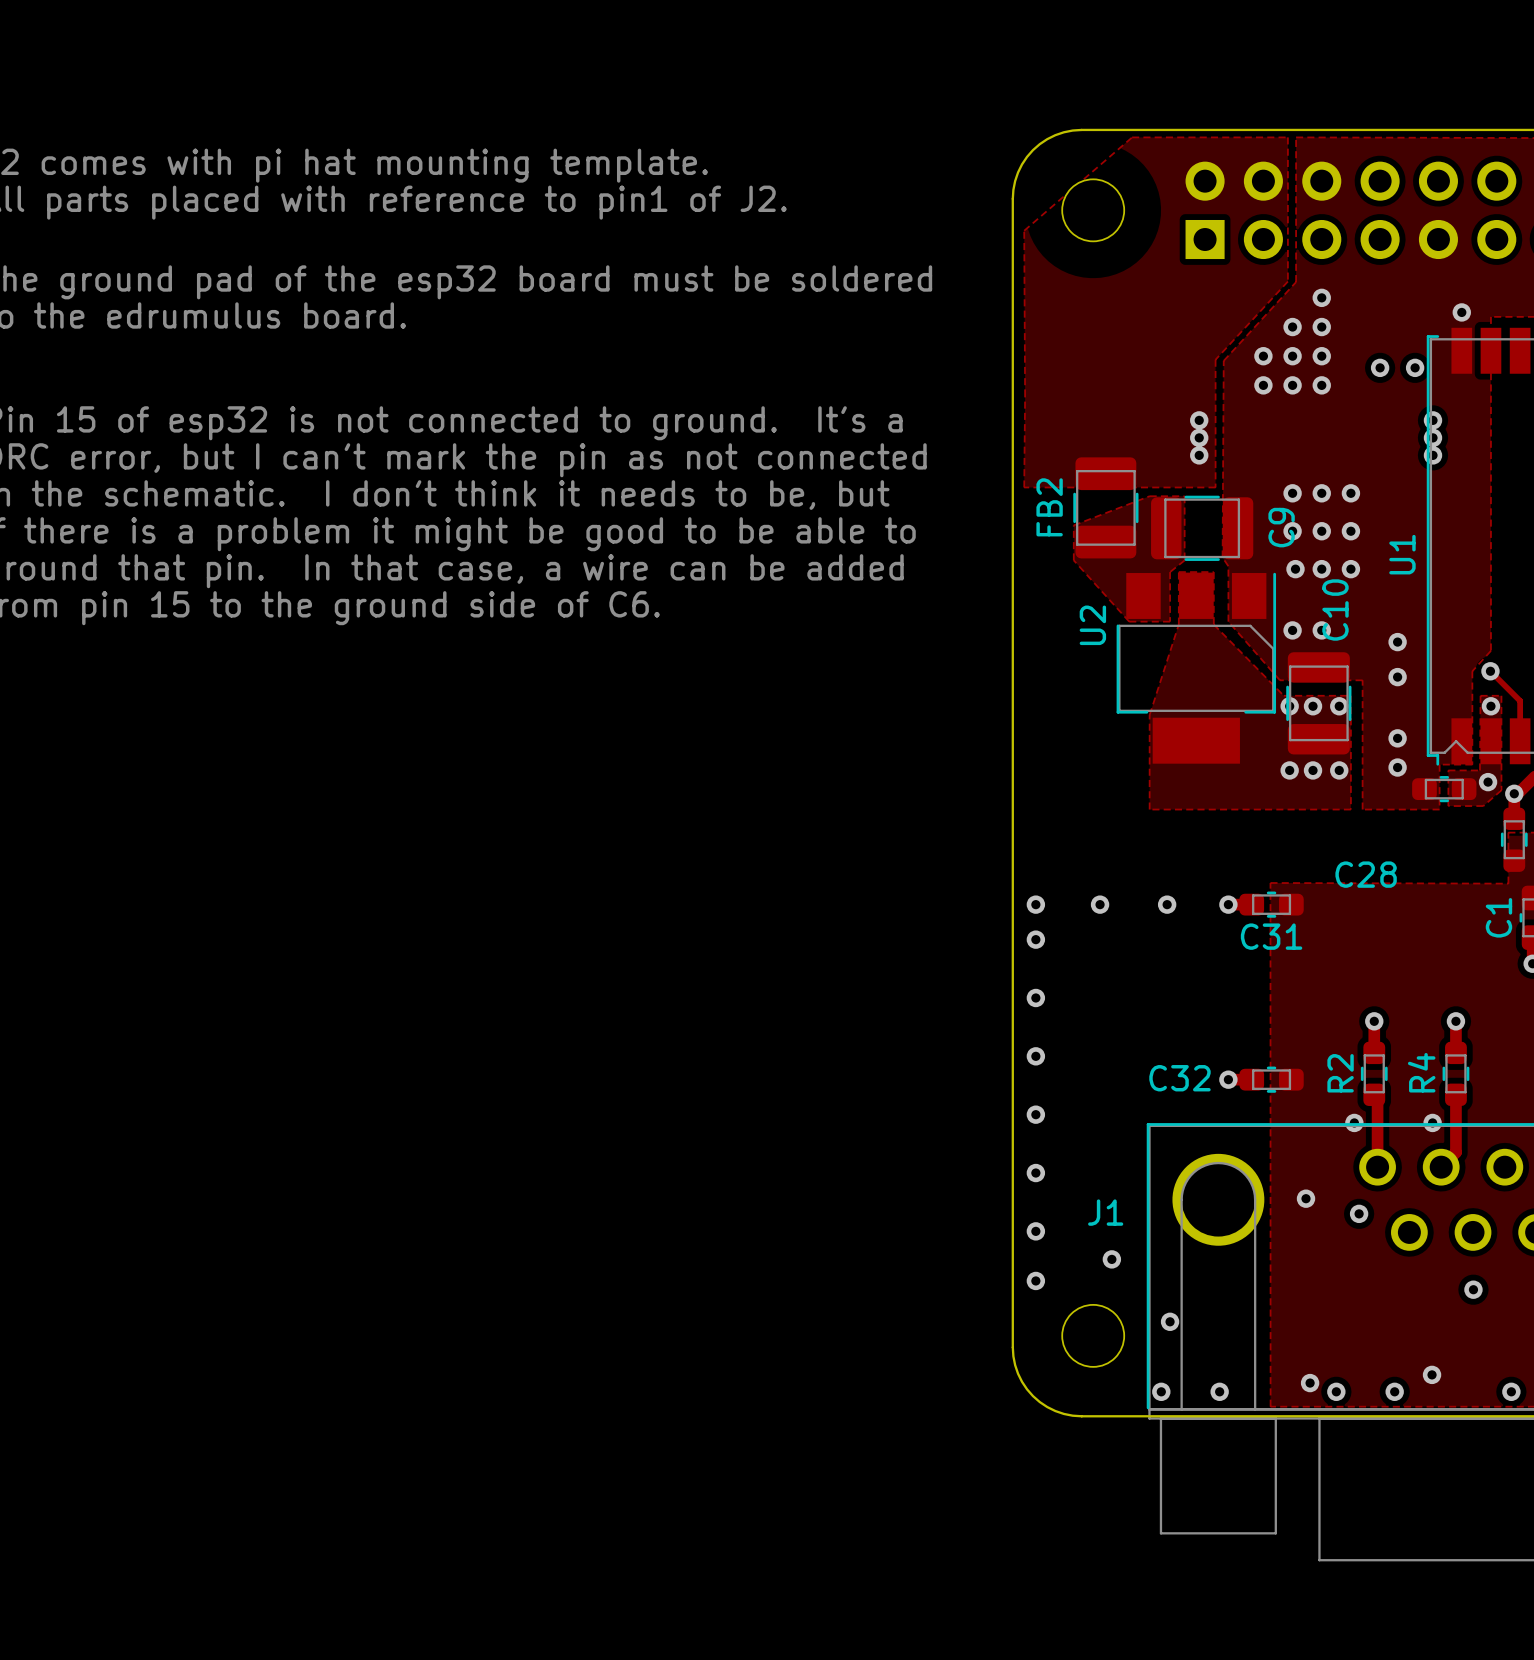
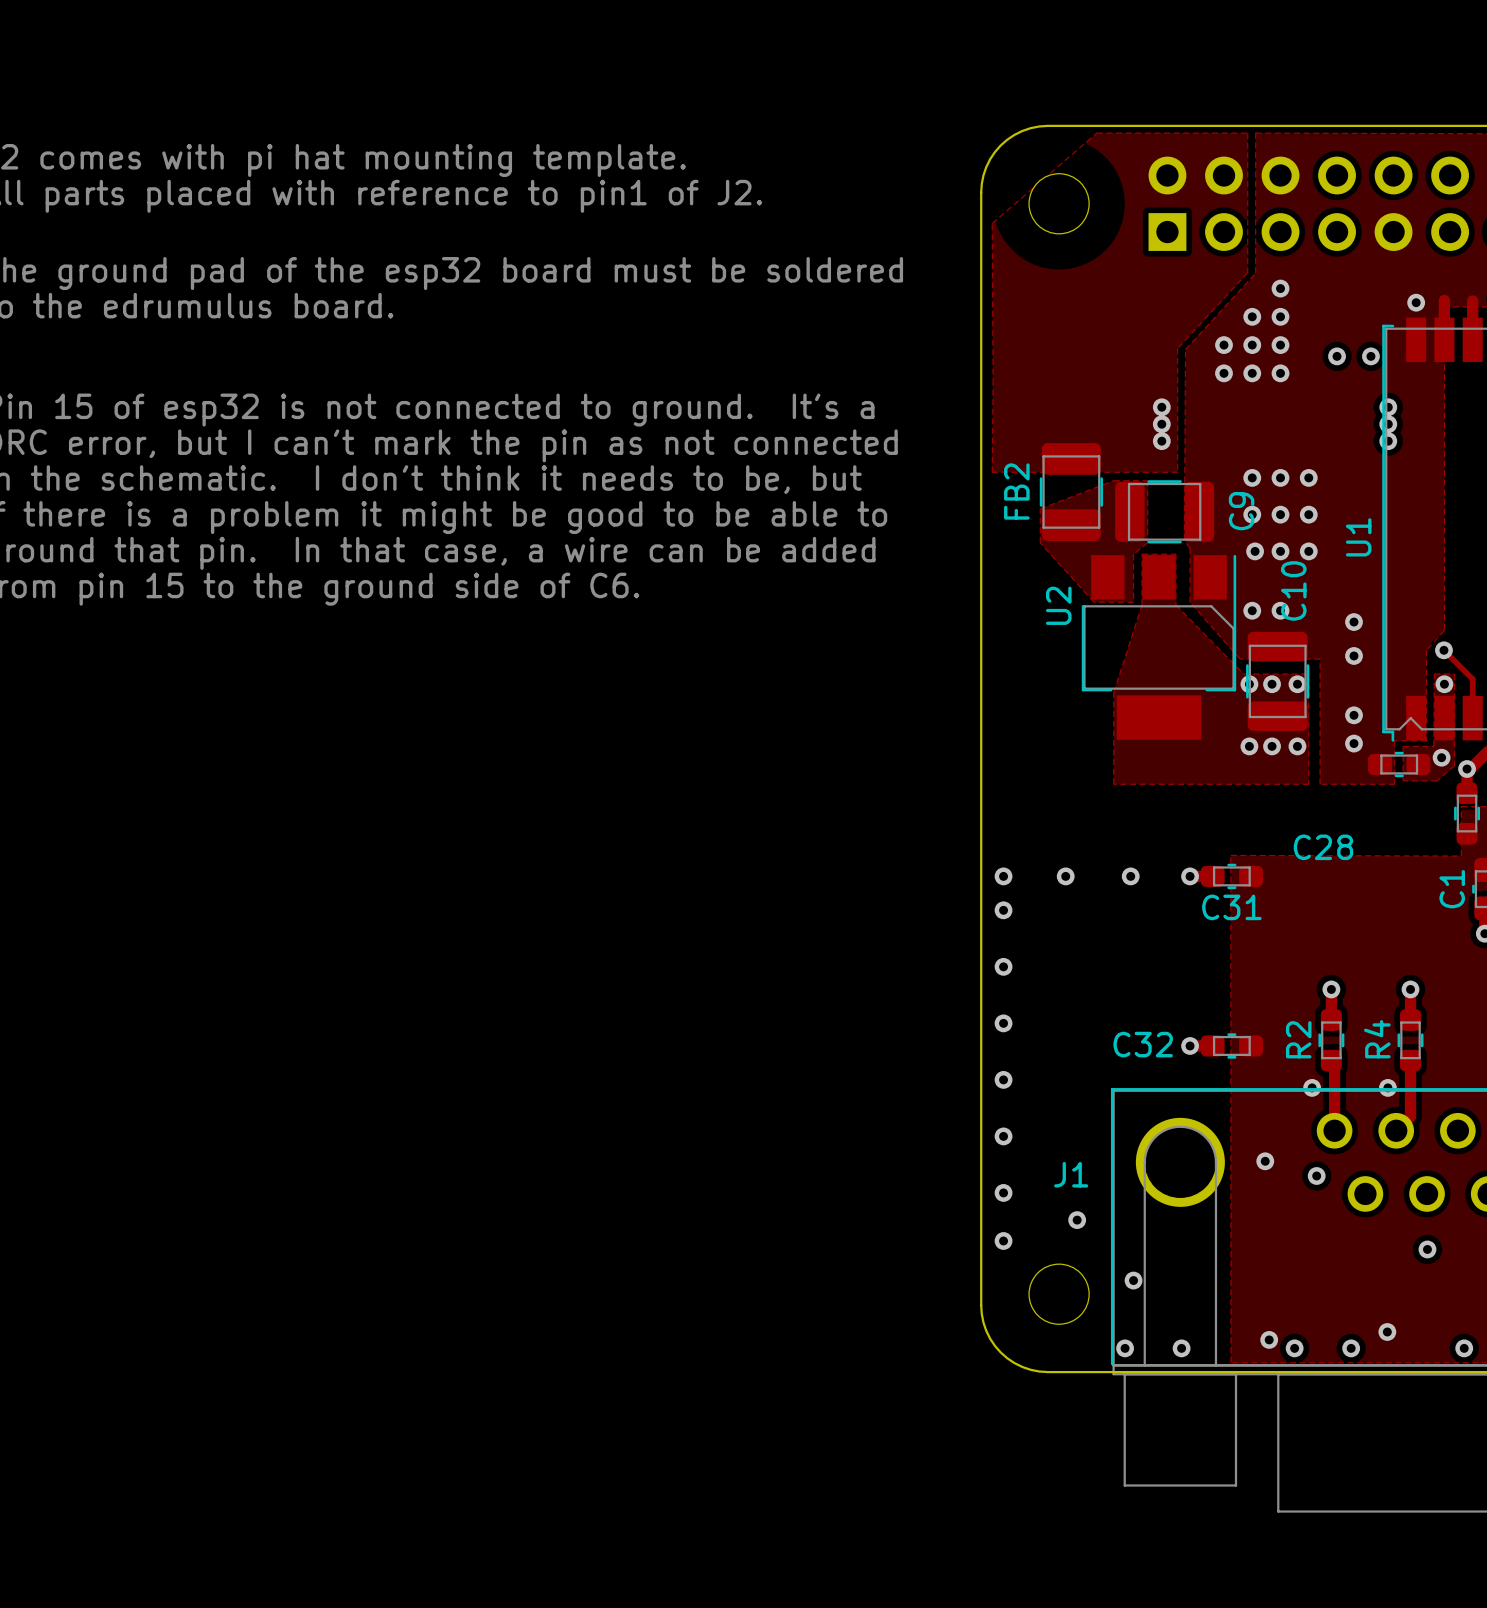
track: none -> (1444, 300) (1444, 339)
track: none -> (1472, 300) (1472, 339)

